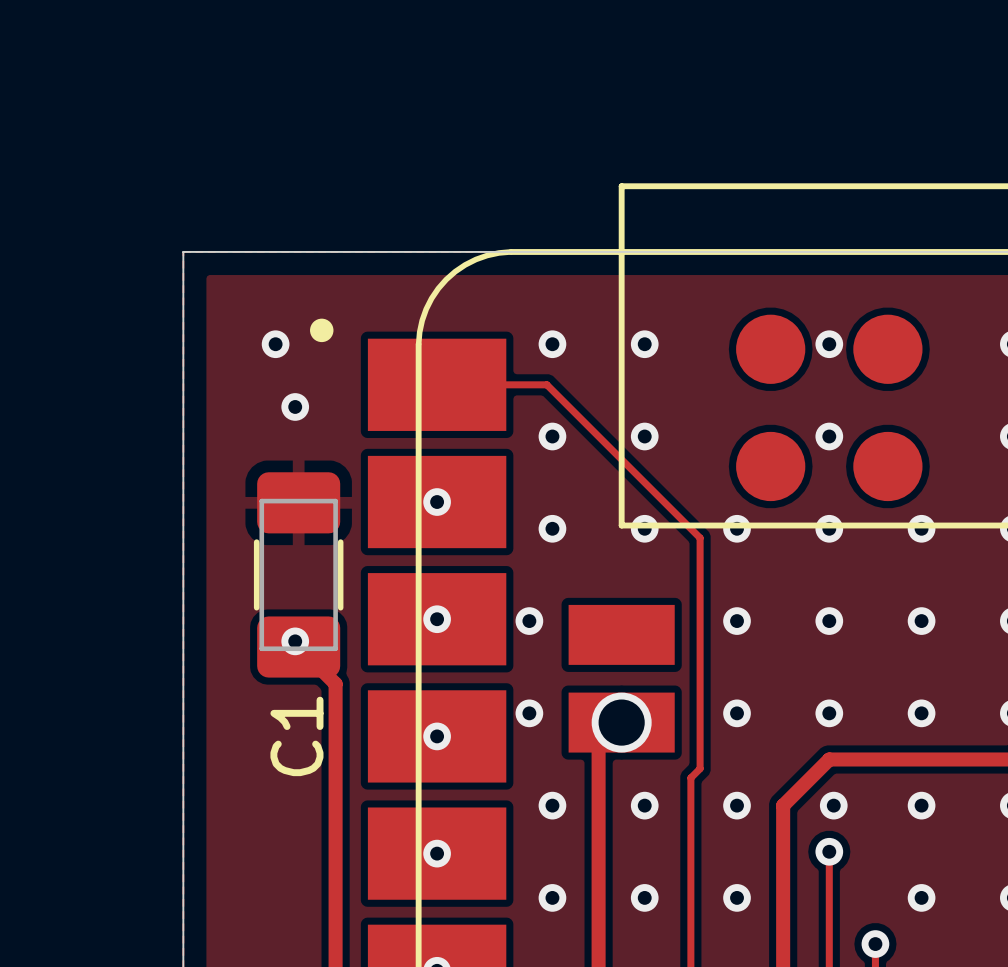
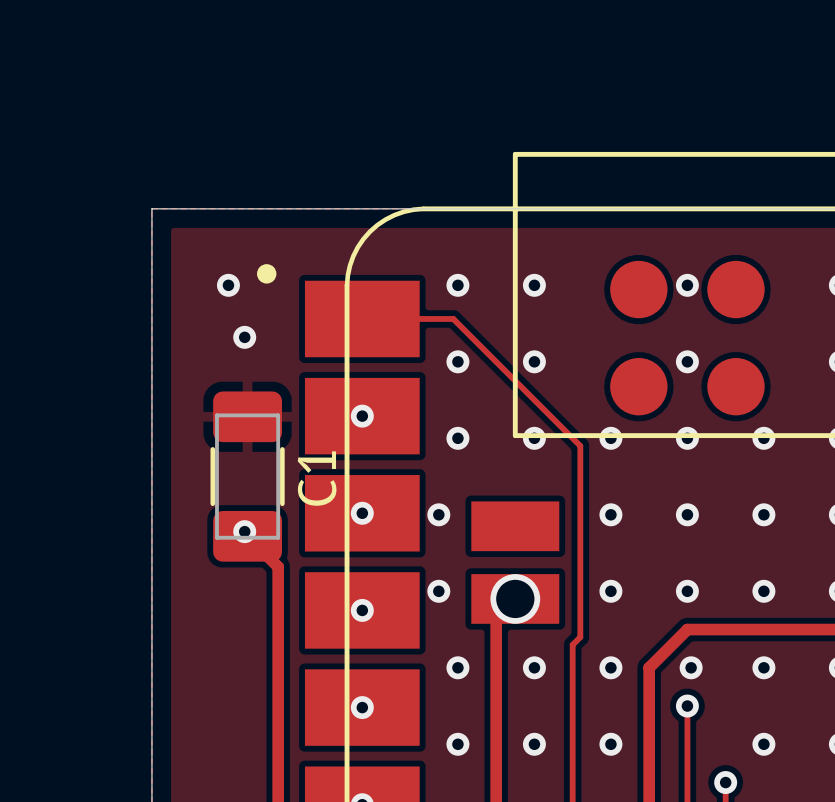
C1 name position: C1 (296, 736) -> C1 (317, 478)

